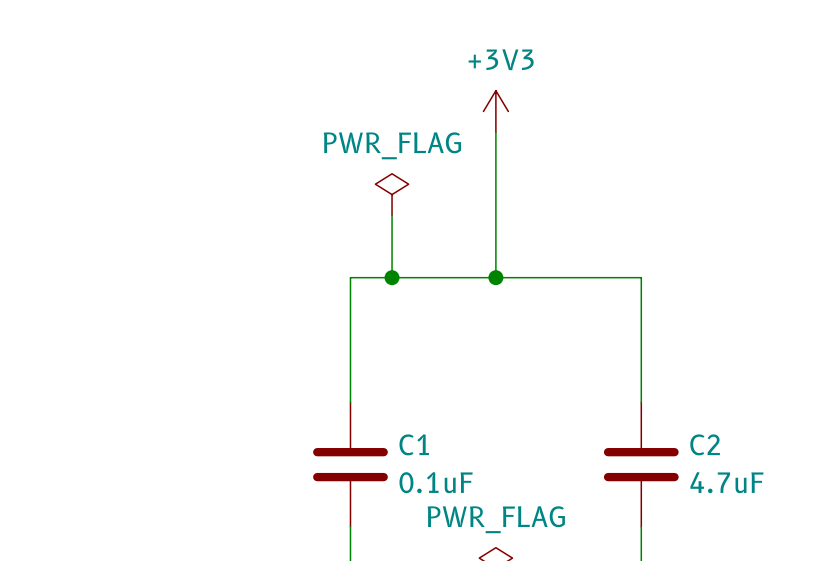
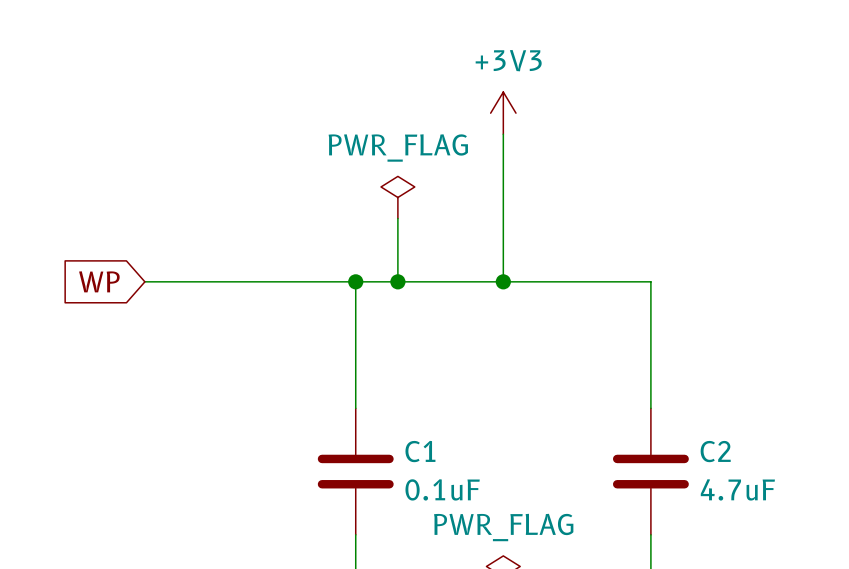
global label: none -> WP (99, 281)
wire: none -> (144, 281) (355, 281)
junction: none -> (355, 281)

